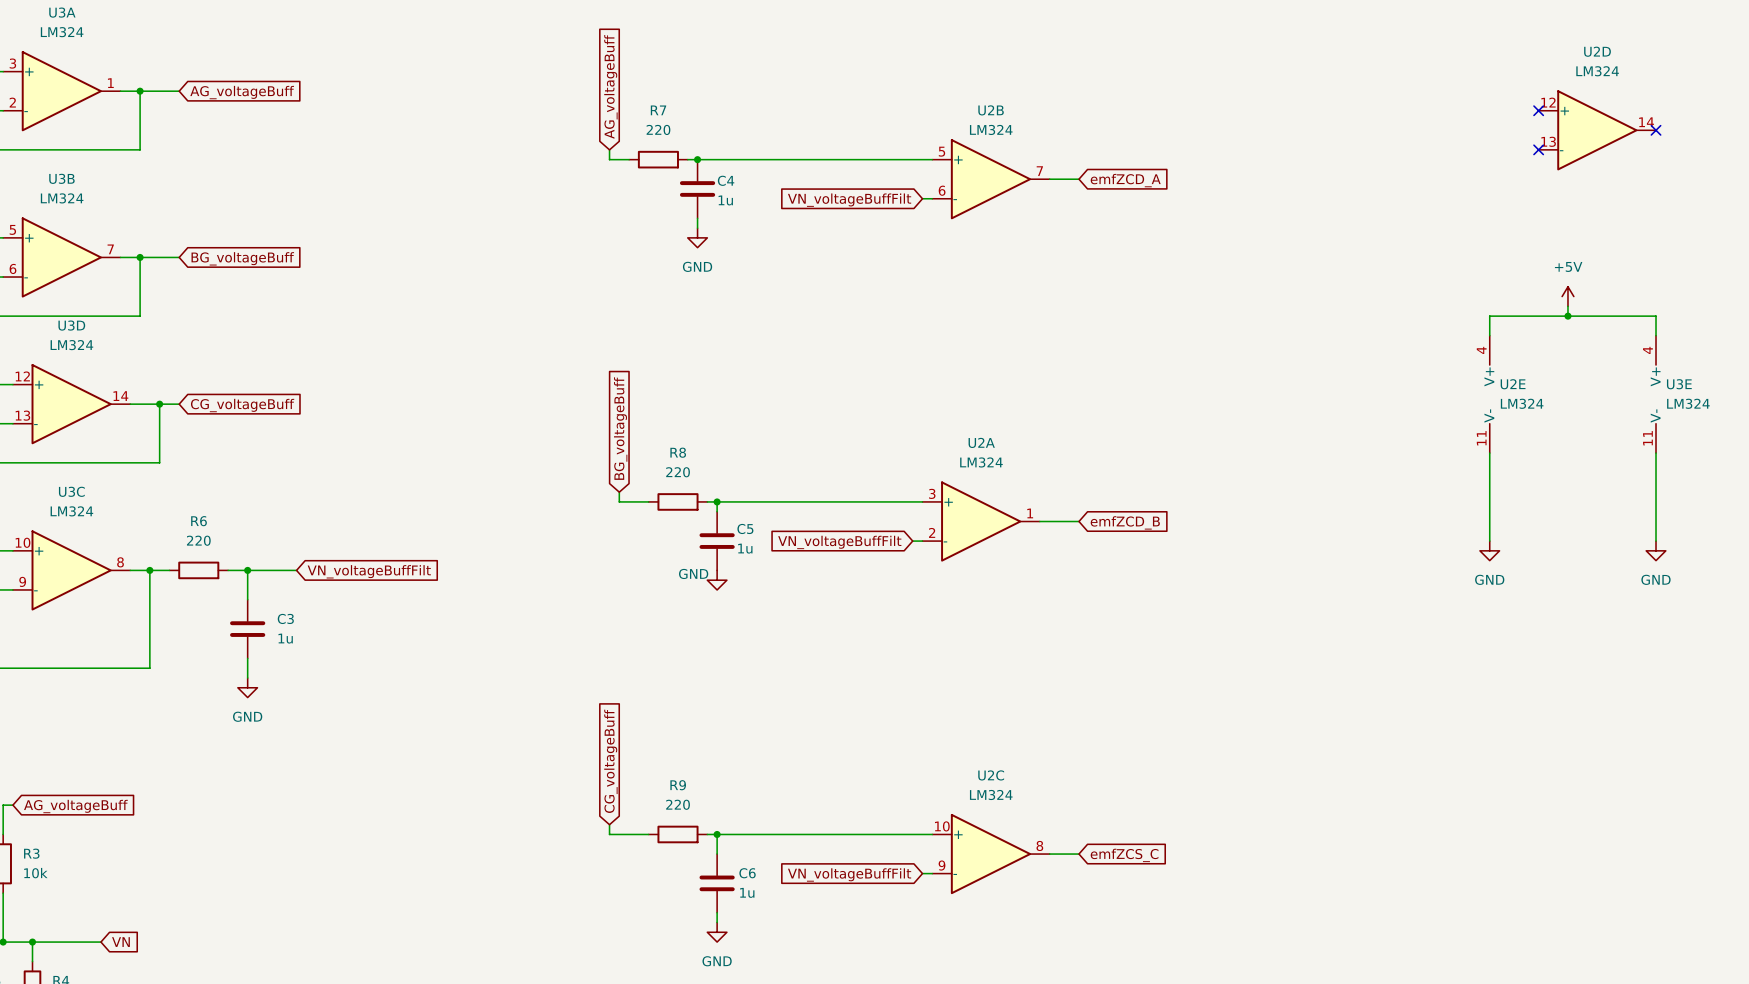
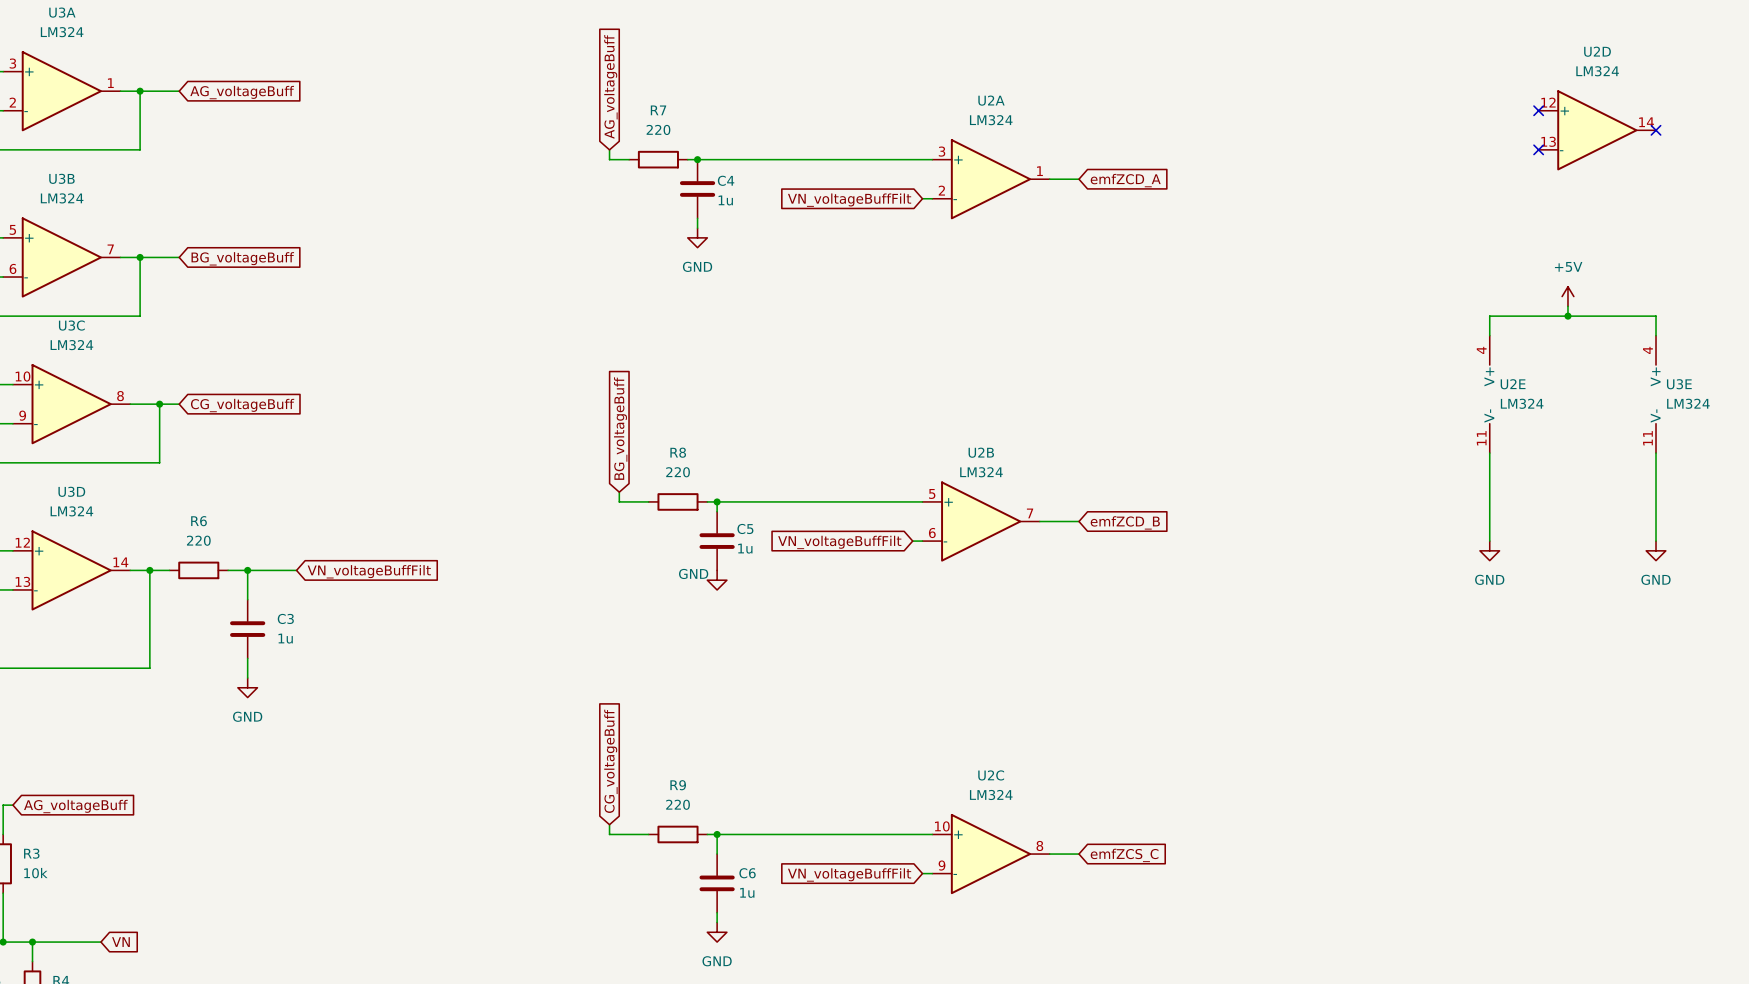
U2B position: (990, 179) -> (981, 521)
U3D position: (71, 404) -> (71, 570)
U2A position: (981, 521) -> (990, 179)
U3C position: (71, 570) -> (71, 404)

